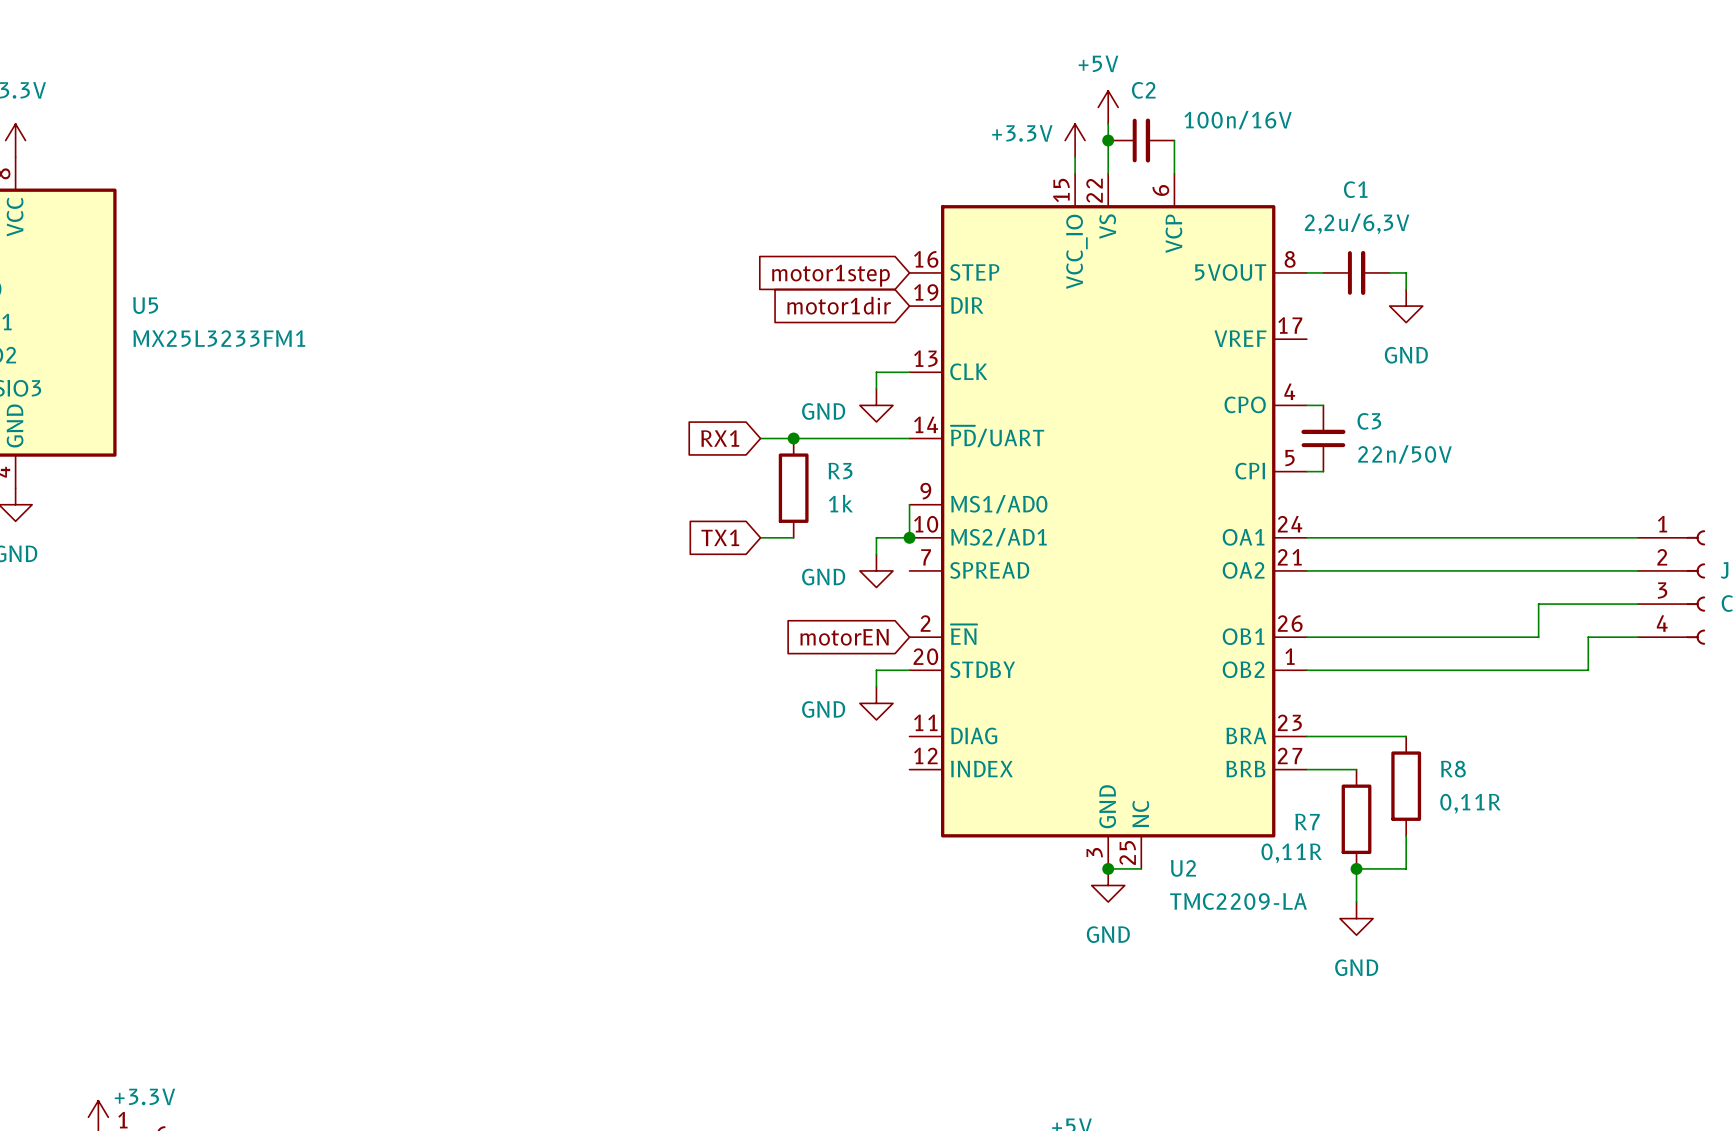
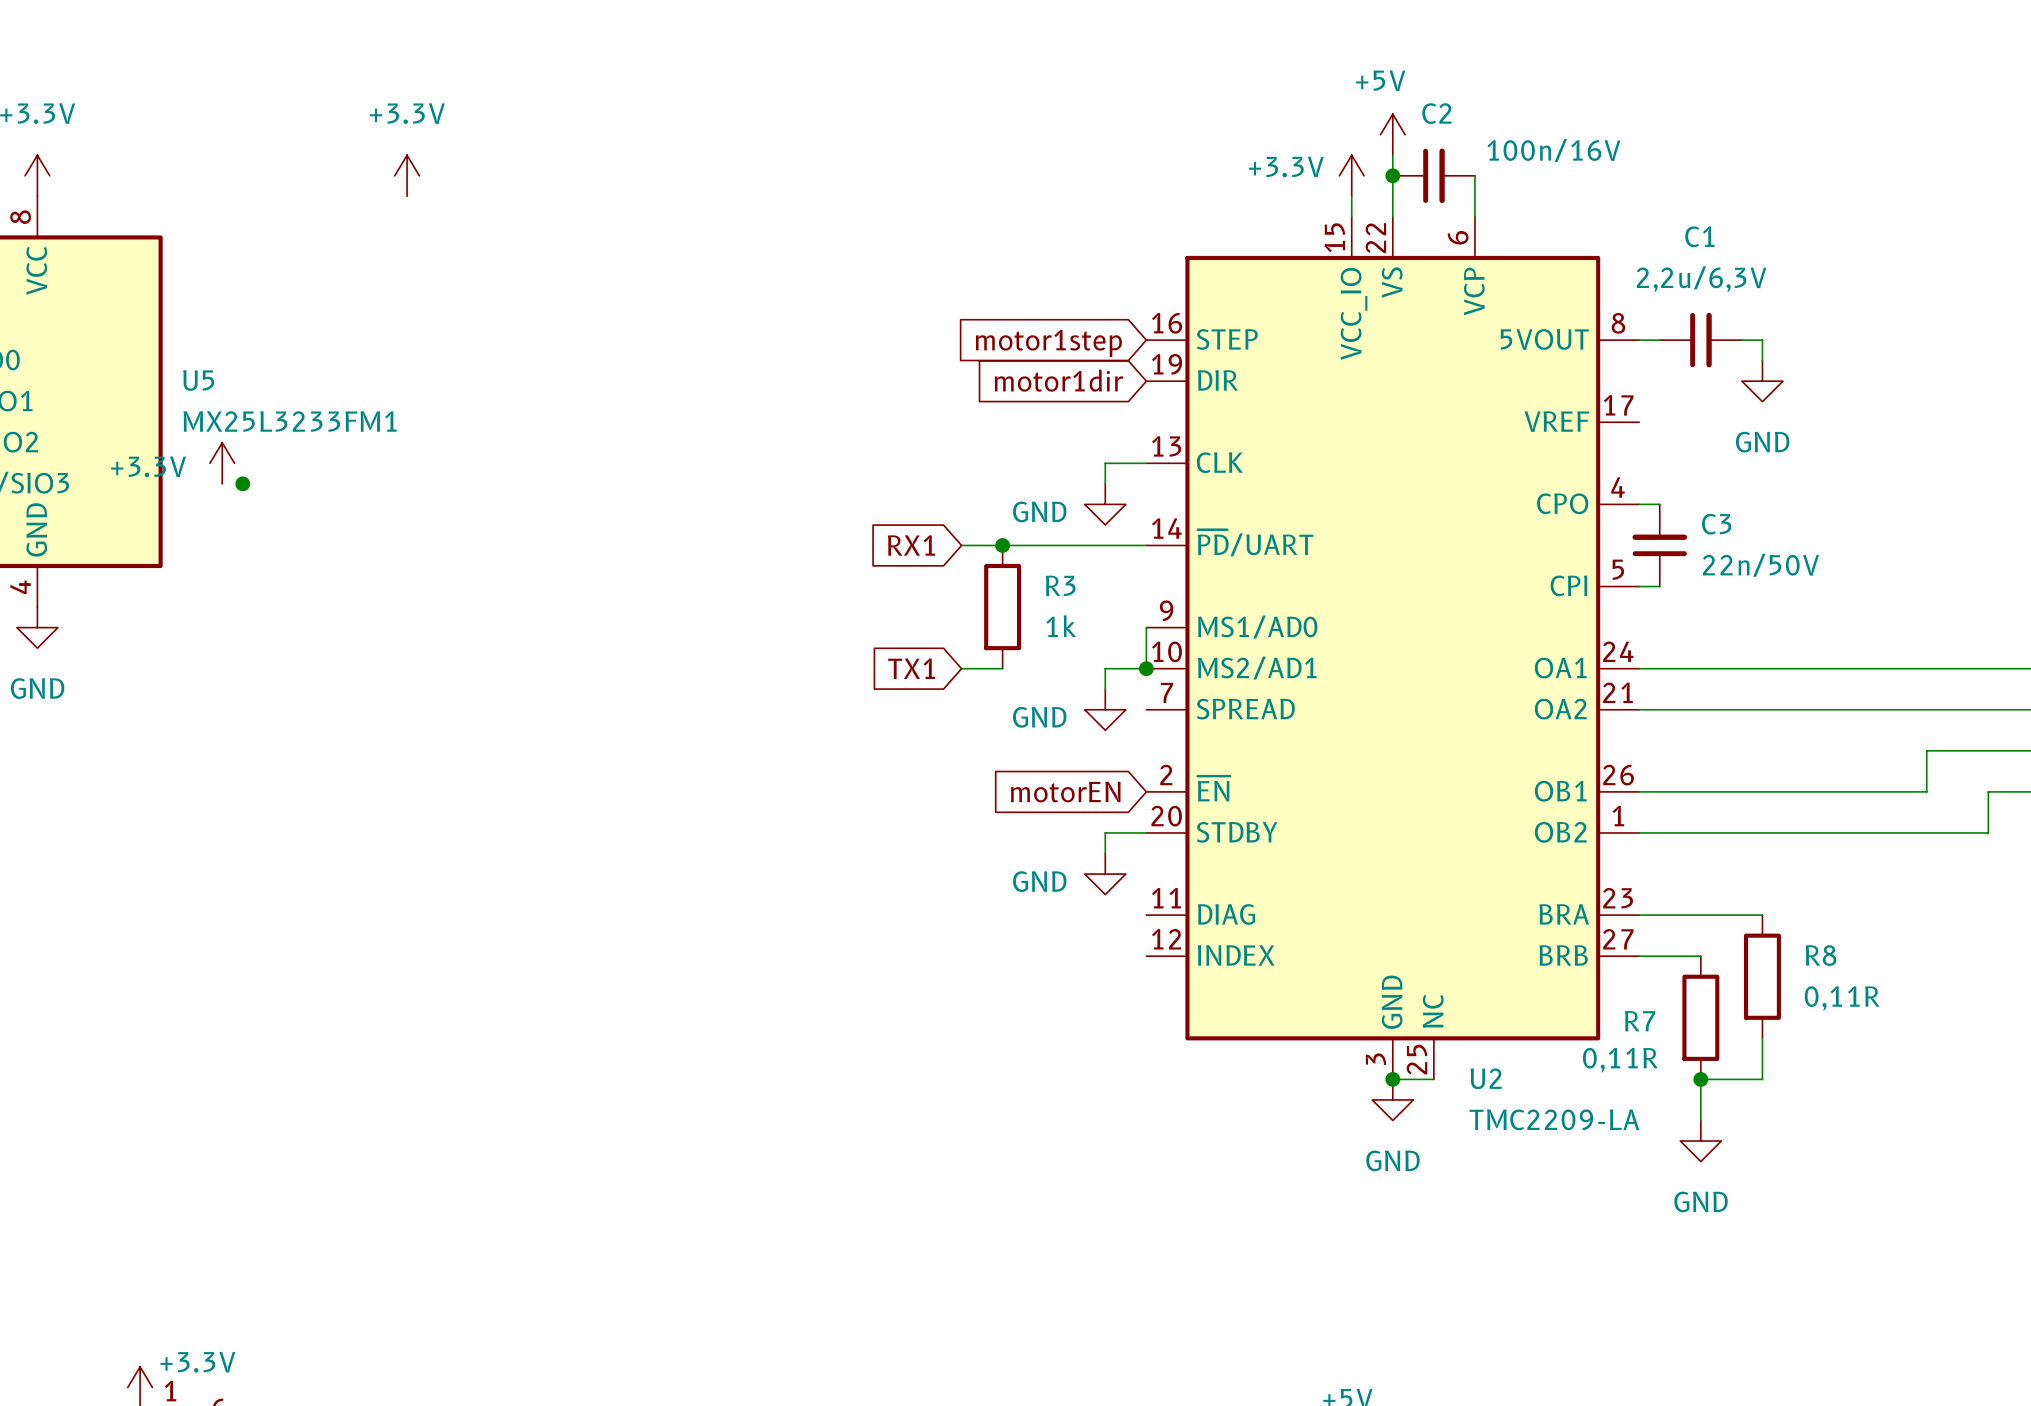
power symbol: none -> +3.3V (407, 175)
power symbol: none -> +3.3V (222, 463)
junction: none -> (242, 483)

